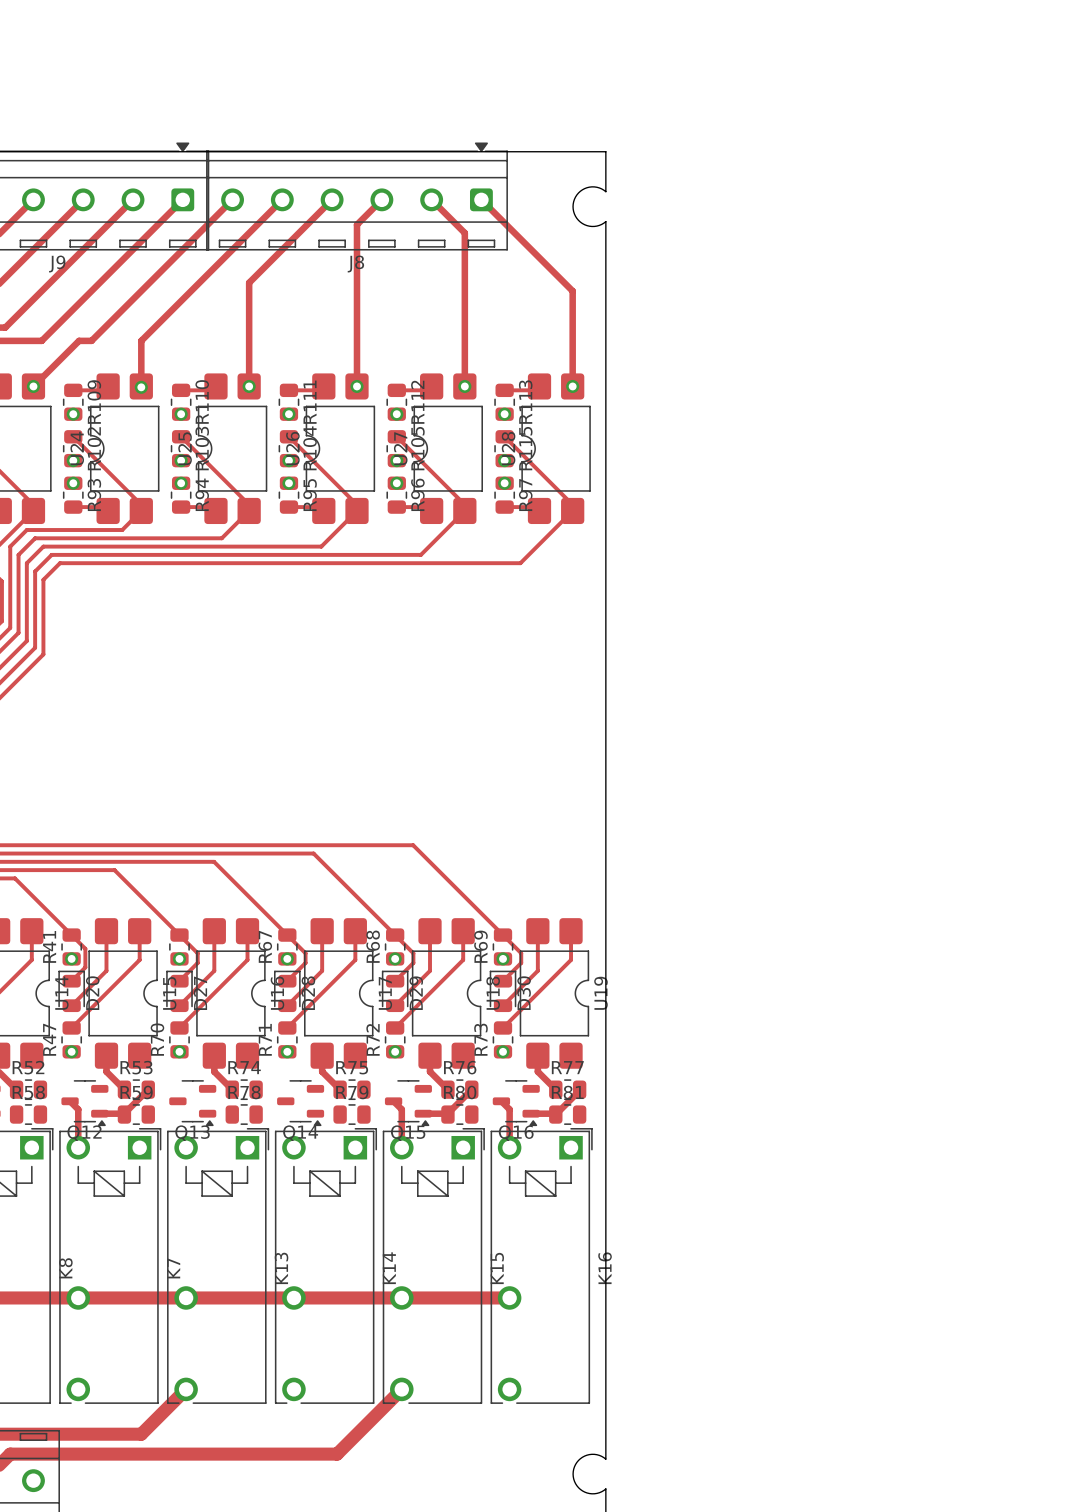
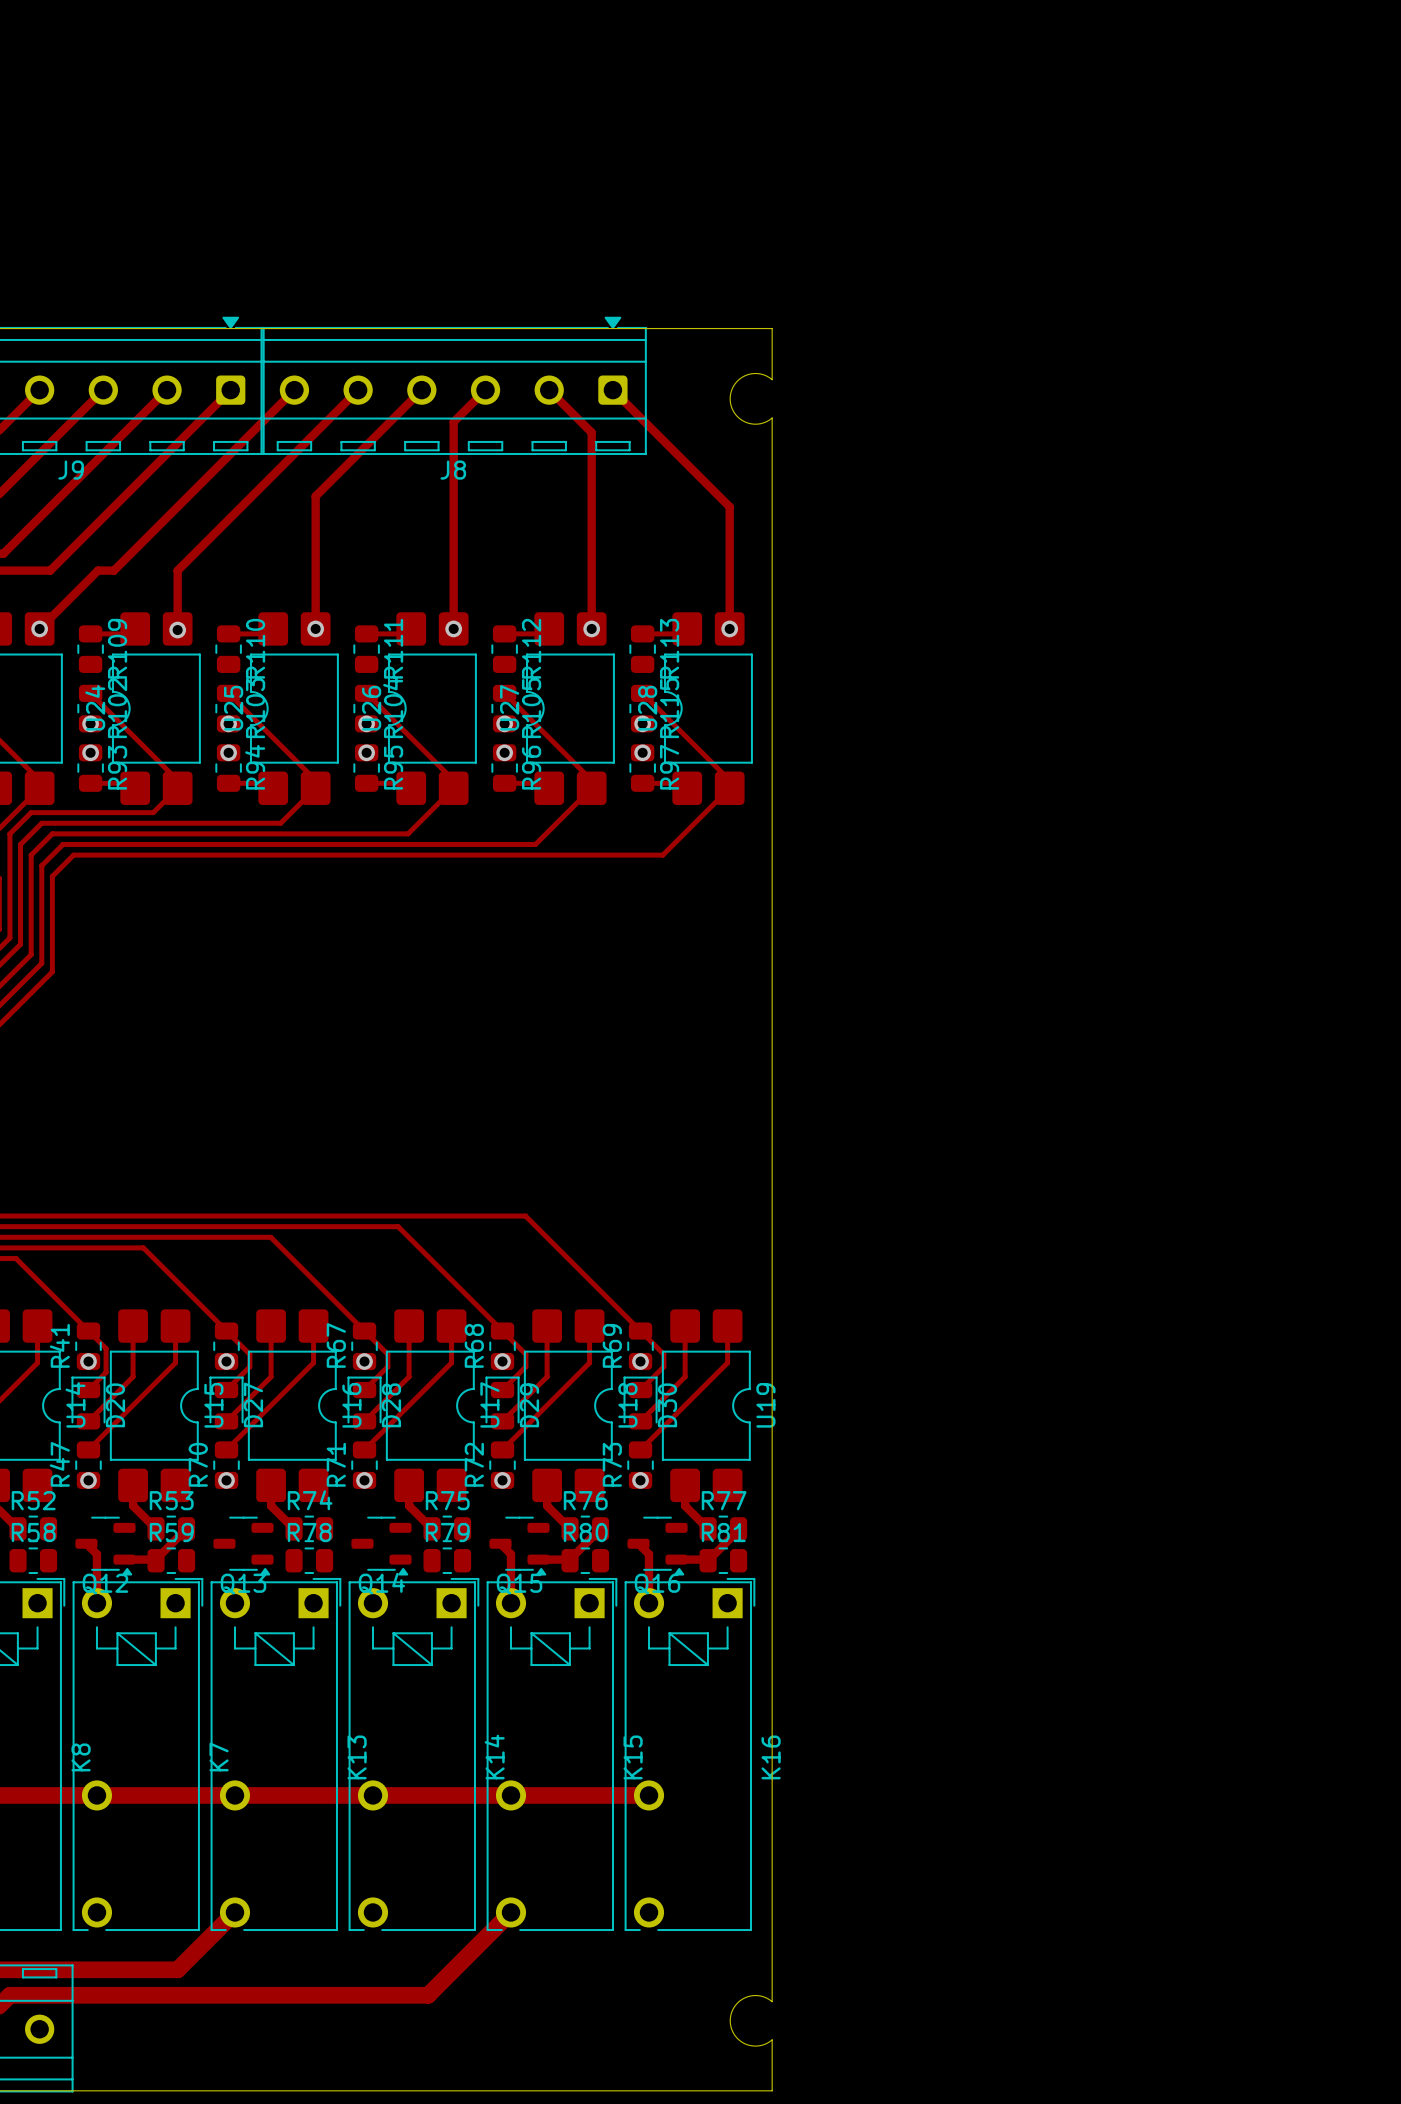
via: (73, 414) -> none
via: (181, 414) -> none
via: (288, 414) -> none
via: (396, 414) -> none
via: (504, 414) -> none

